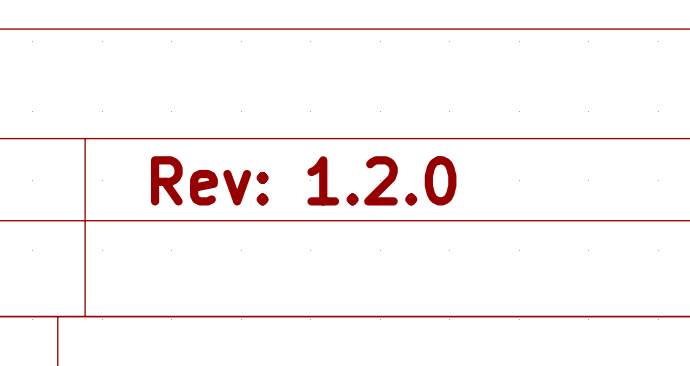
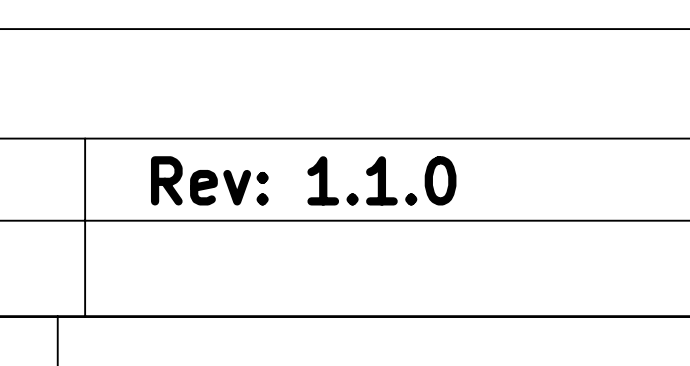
title block: Rev: 1.2.0 (303, 180) -> Rev: 1.1.0 (303, 180)

